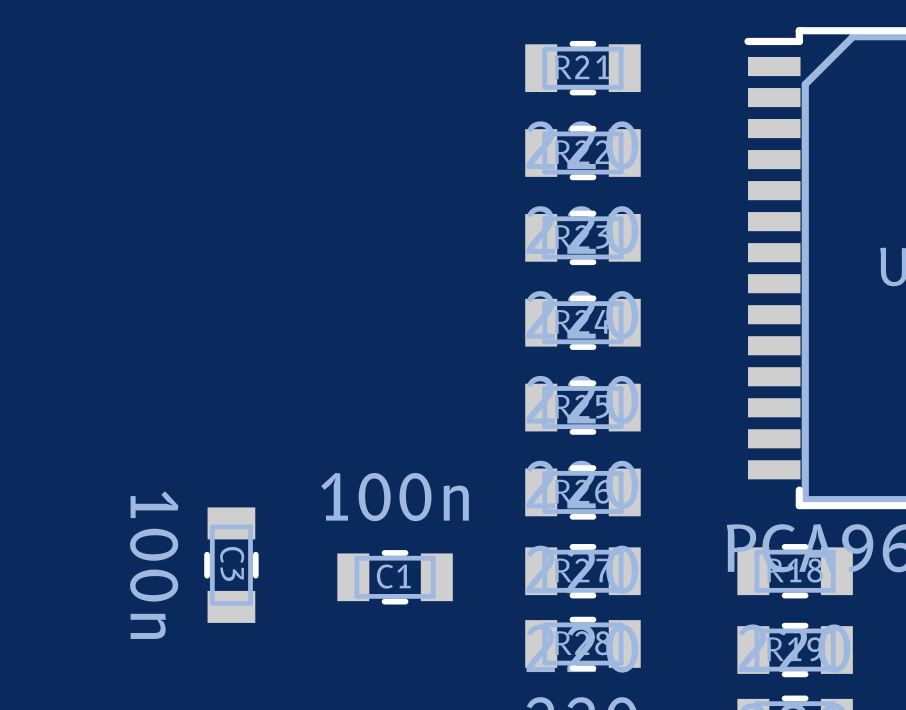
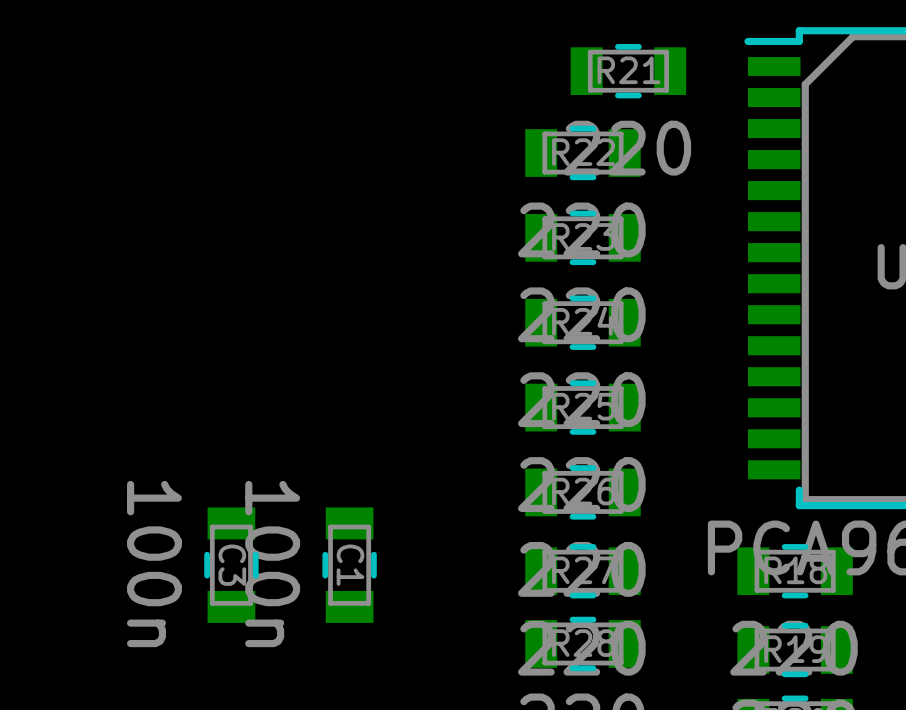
R21 position: (582, 68) -> (628, 71)
C1 value position: 100n (395, 497) -> 100n (272, 564)
C1 rotation: 0° (395, 577) -> 90° clockwise (349, 565)

